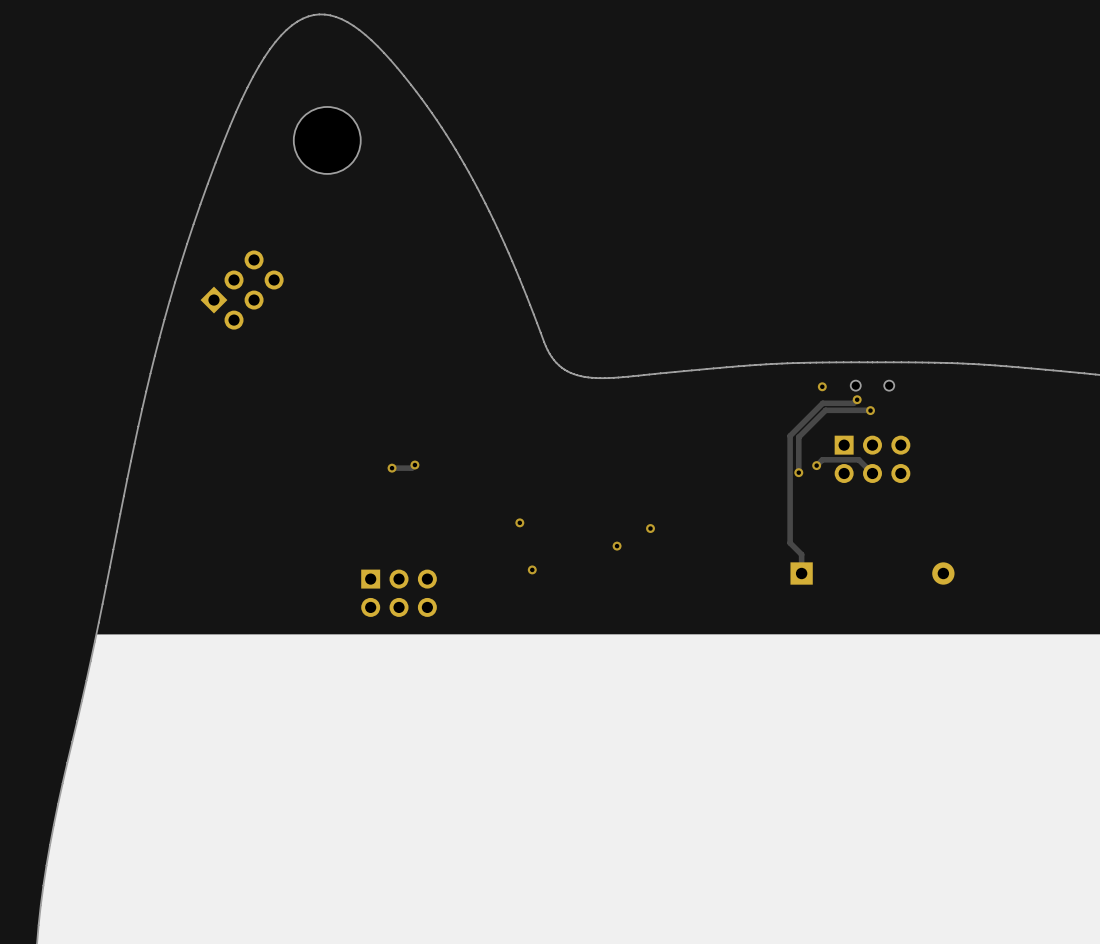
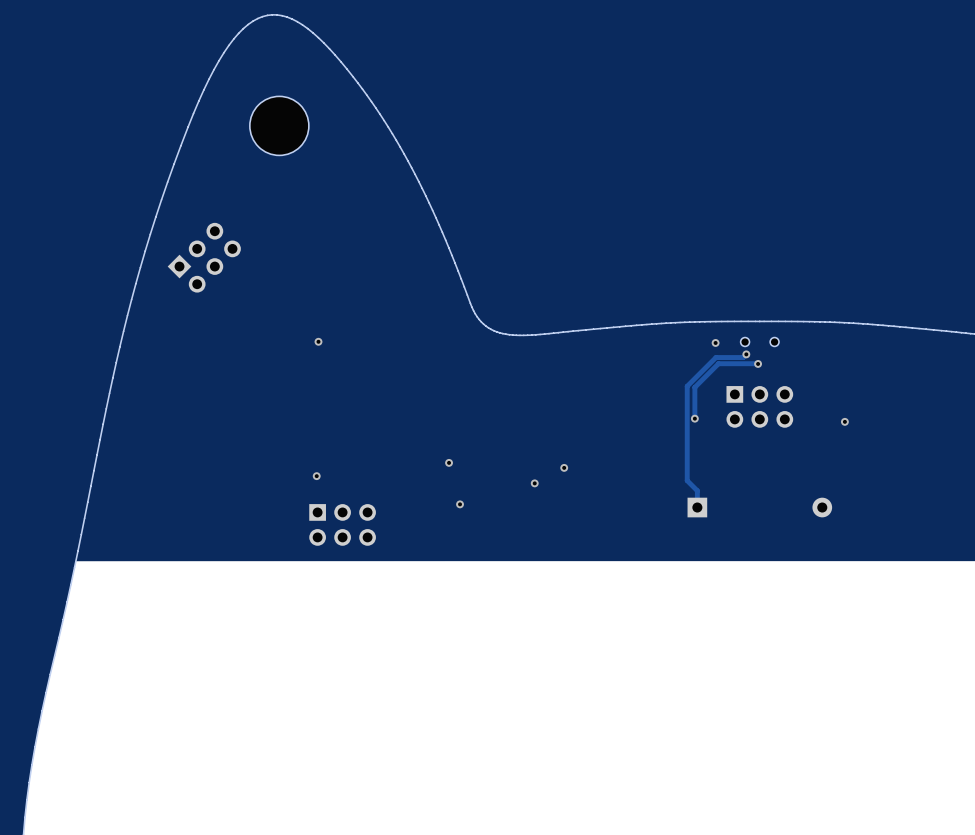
via: none -> (318, 341)
track: (414, 465) (411, 468) (392, 468) -> none
via: (414, 465) -> none
track: (816, 465) (822, 459) (858, 459) (872, 473) -> none
via: (816, 465) -> none
via: (392, 468) -> none
via: none -> (844, 421)
via: none -> (316, 476)

